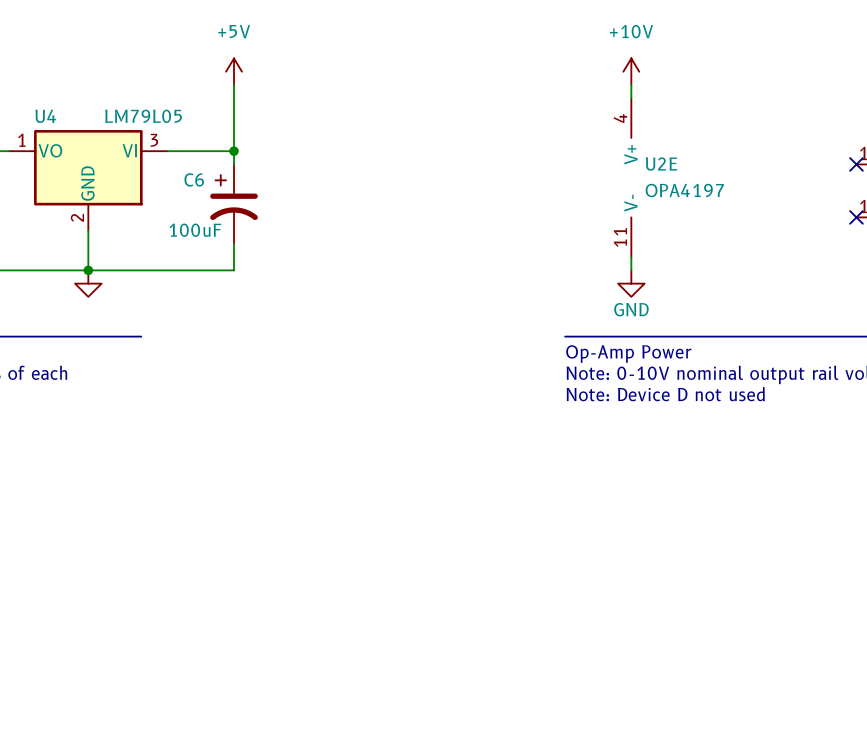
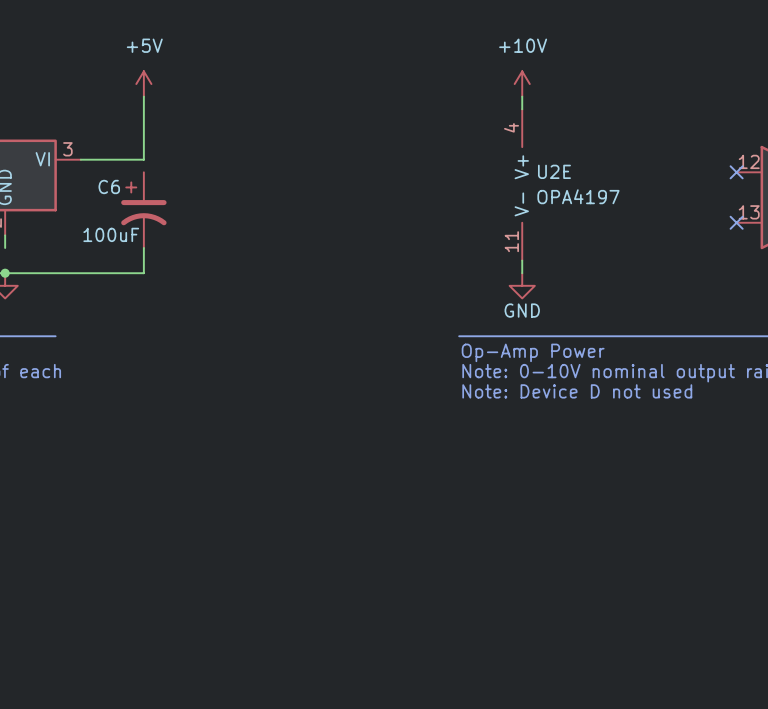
U4 value: LM79L05 (143, 116) -> none
wire: (234, 151) (234, 164) -> none
junction: (234, 151) -> none
wire: (88, 243) (88, 270) -> none

